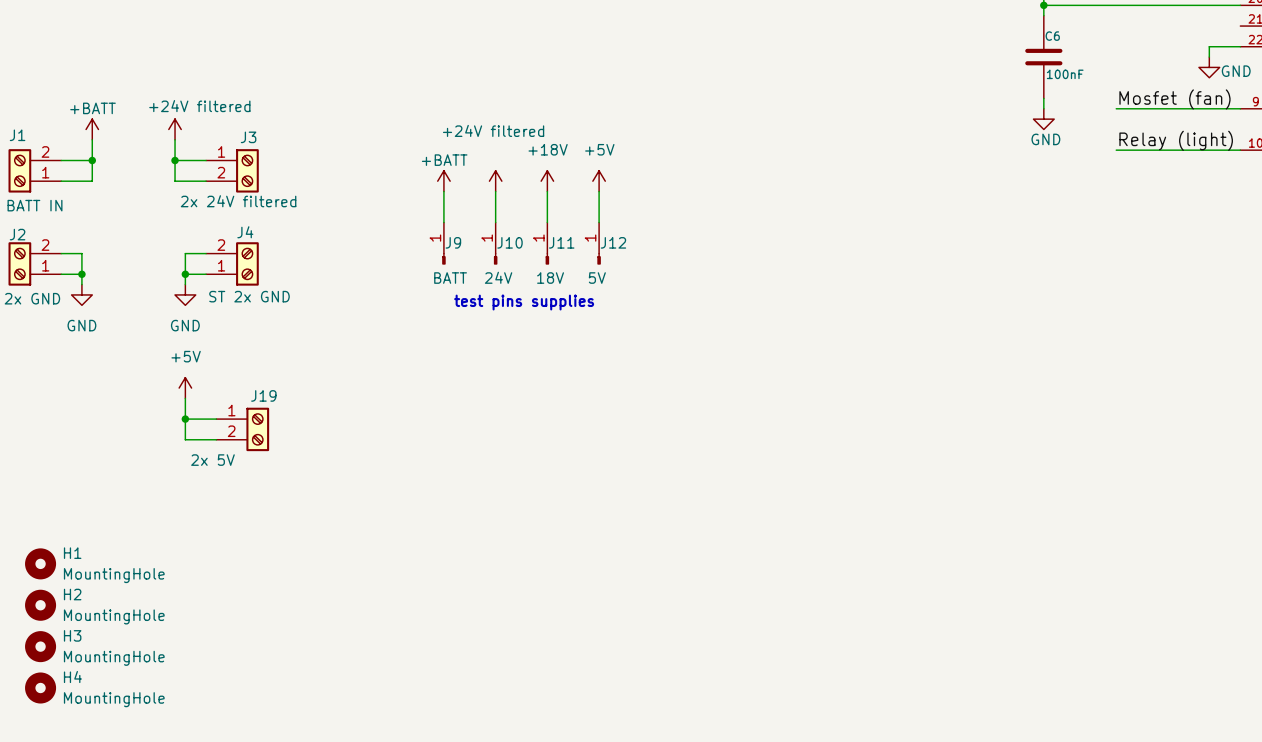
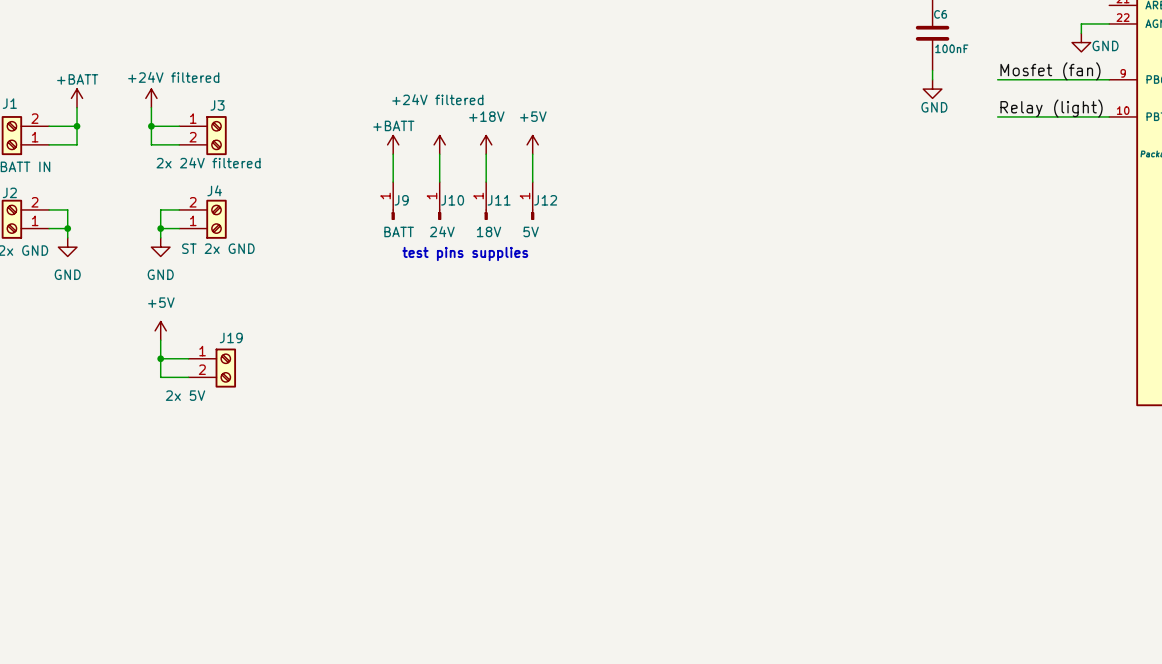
H1: MountingHole (40, 563) -> none
H2: MountingHole (40, 605) -> none
H3: MountingHole (40, 646) -> none
H4: MountingHole (40, 688) -> none

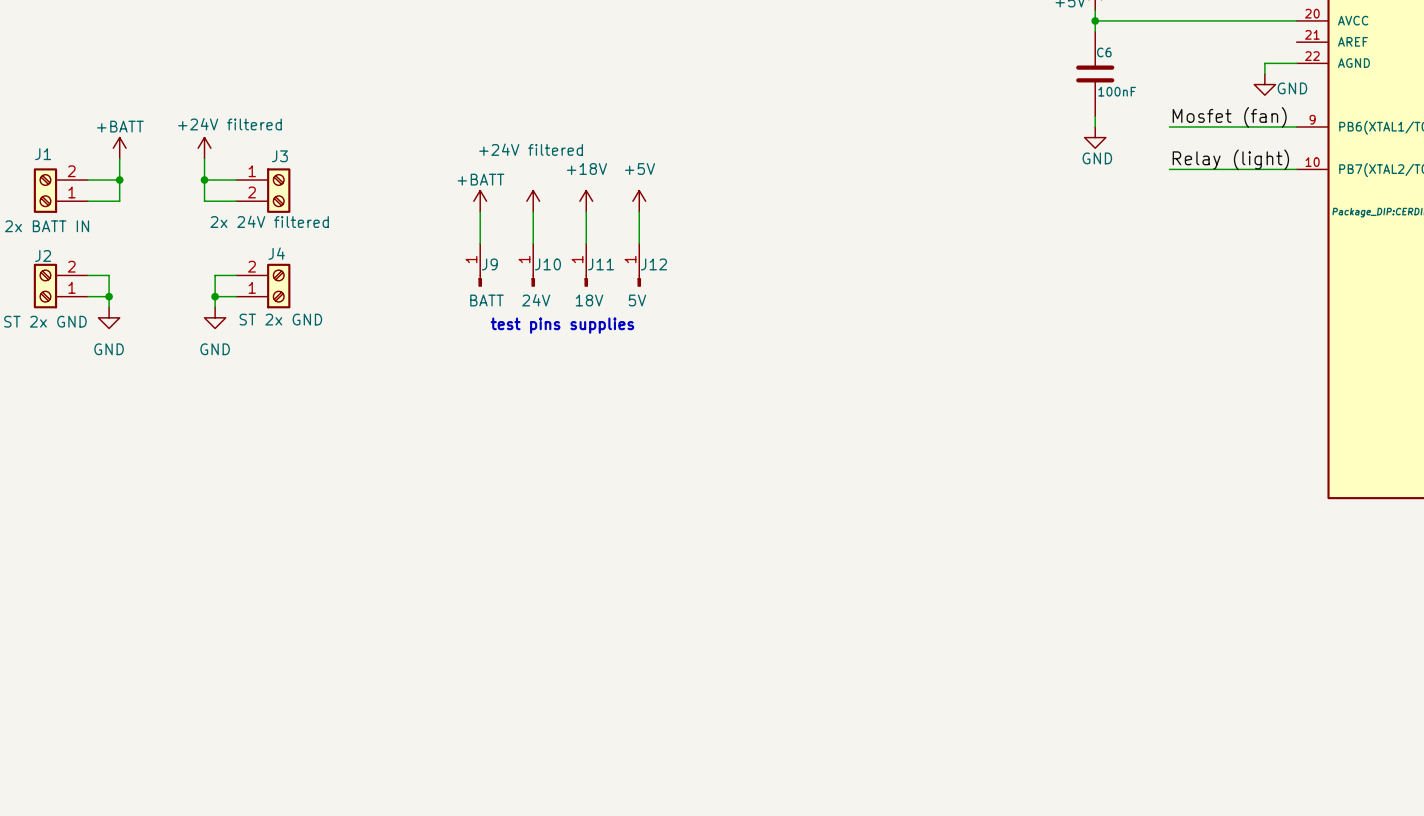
power symbol: +5V (160, 330) -> none
wire: (160, 340) (160, 377) (188, 377) -> none
wire: (160, 358) (188, 358) -> none
junction: (160, 358) -> none
J19: 2x 5V (212, 368) -> none

